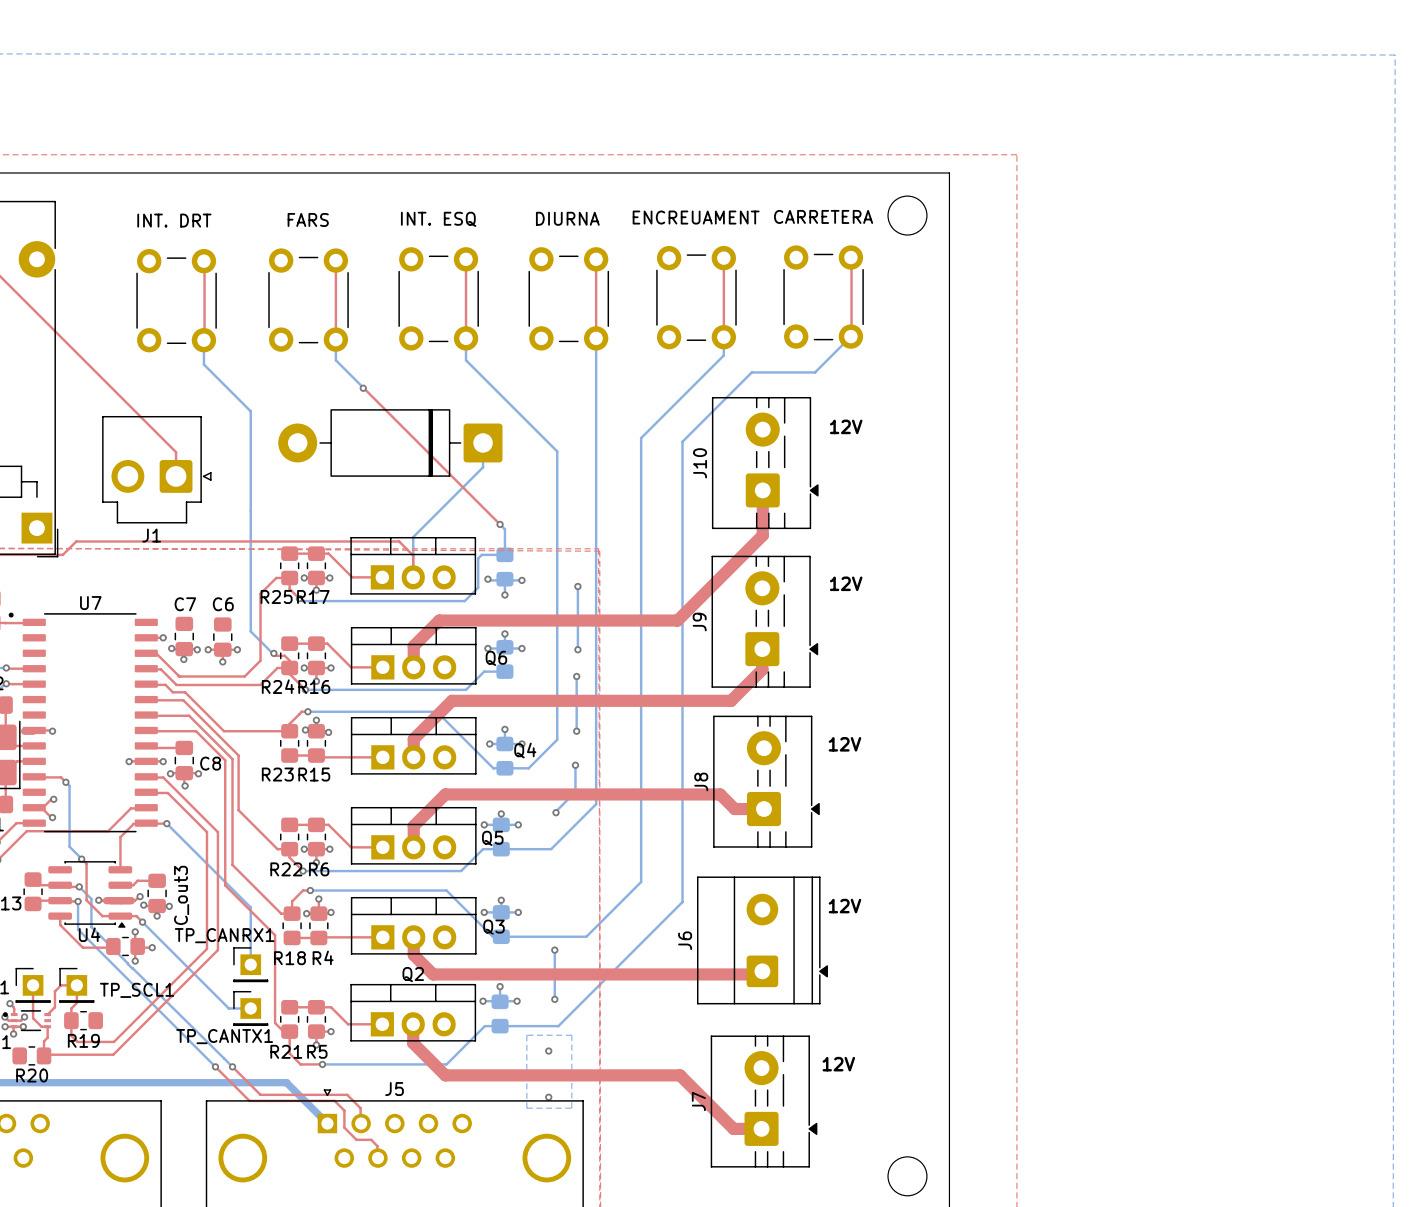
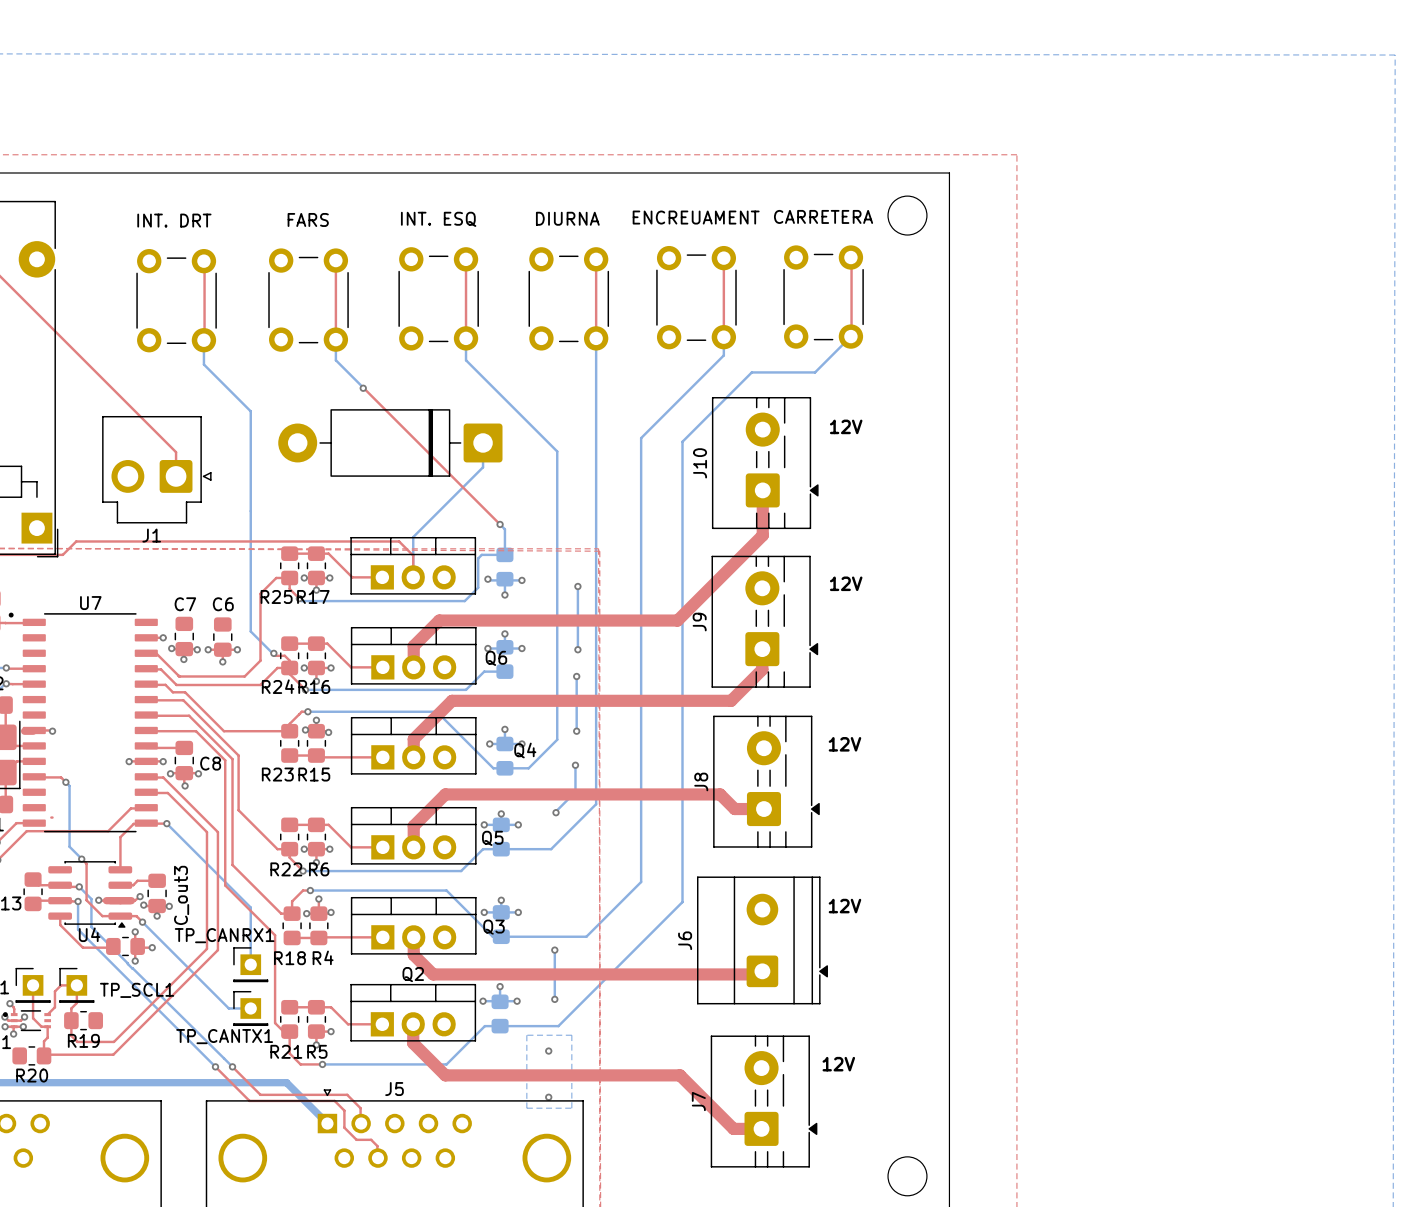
top track: (53, 799) (42, 807) -> none
via: (53, 799) -> none
top track: (41, 807) (51, 817) -> none
via: (52, 817) -> none

